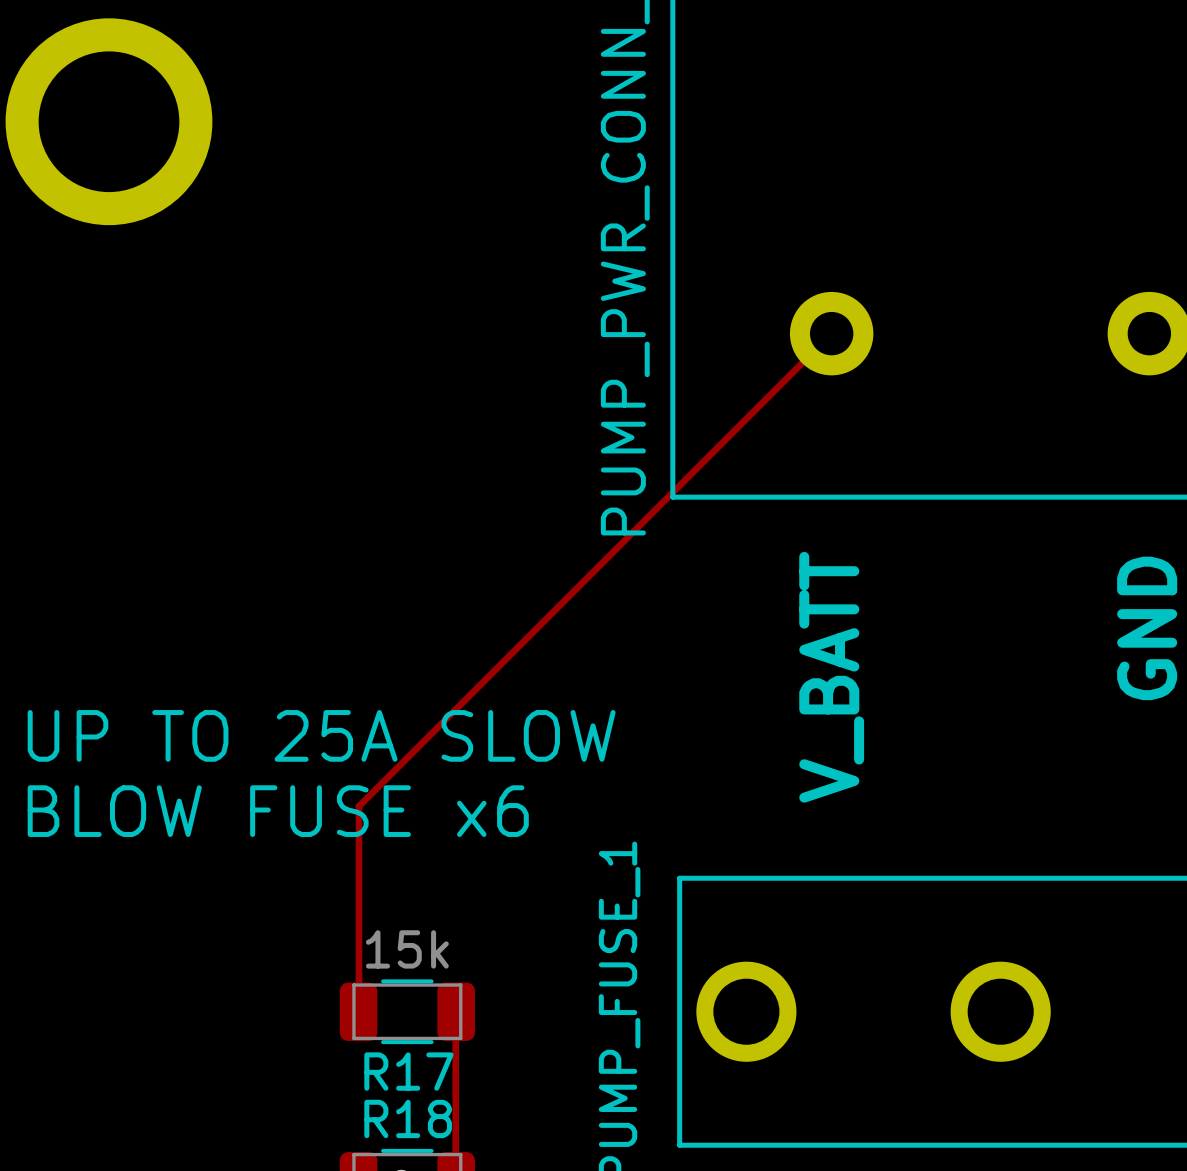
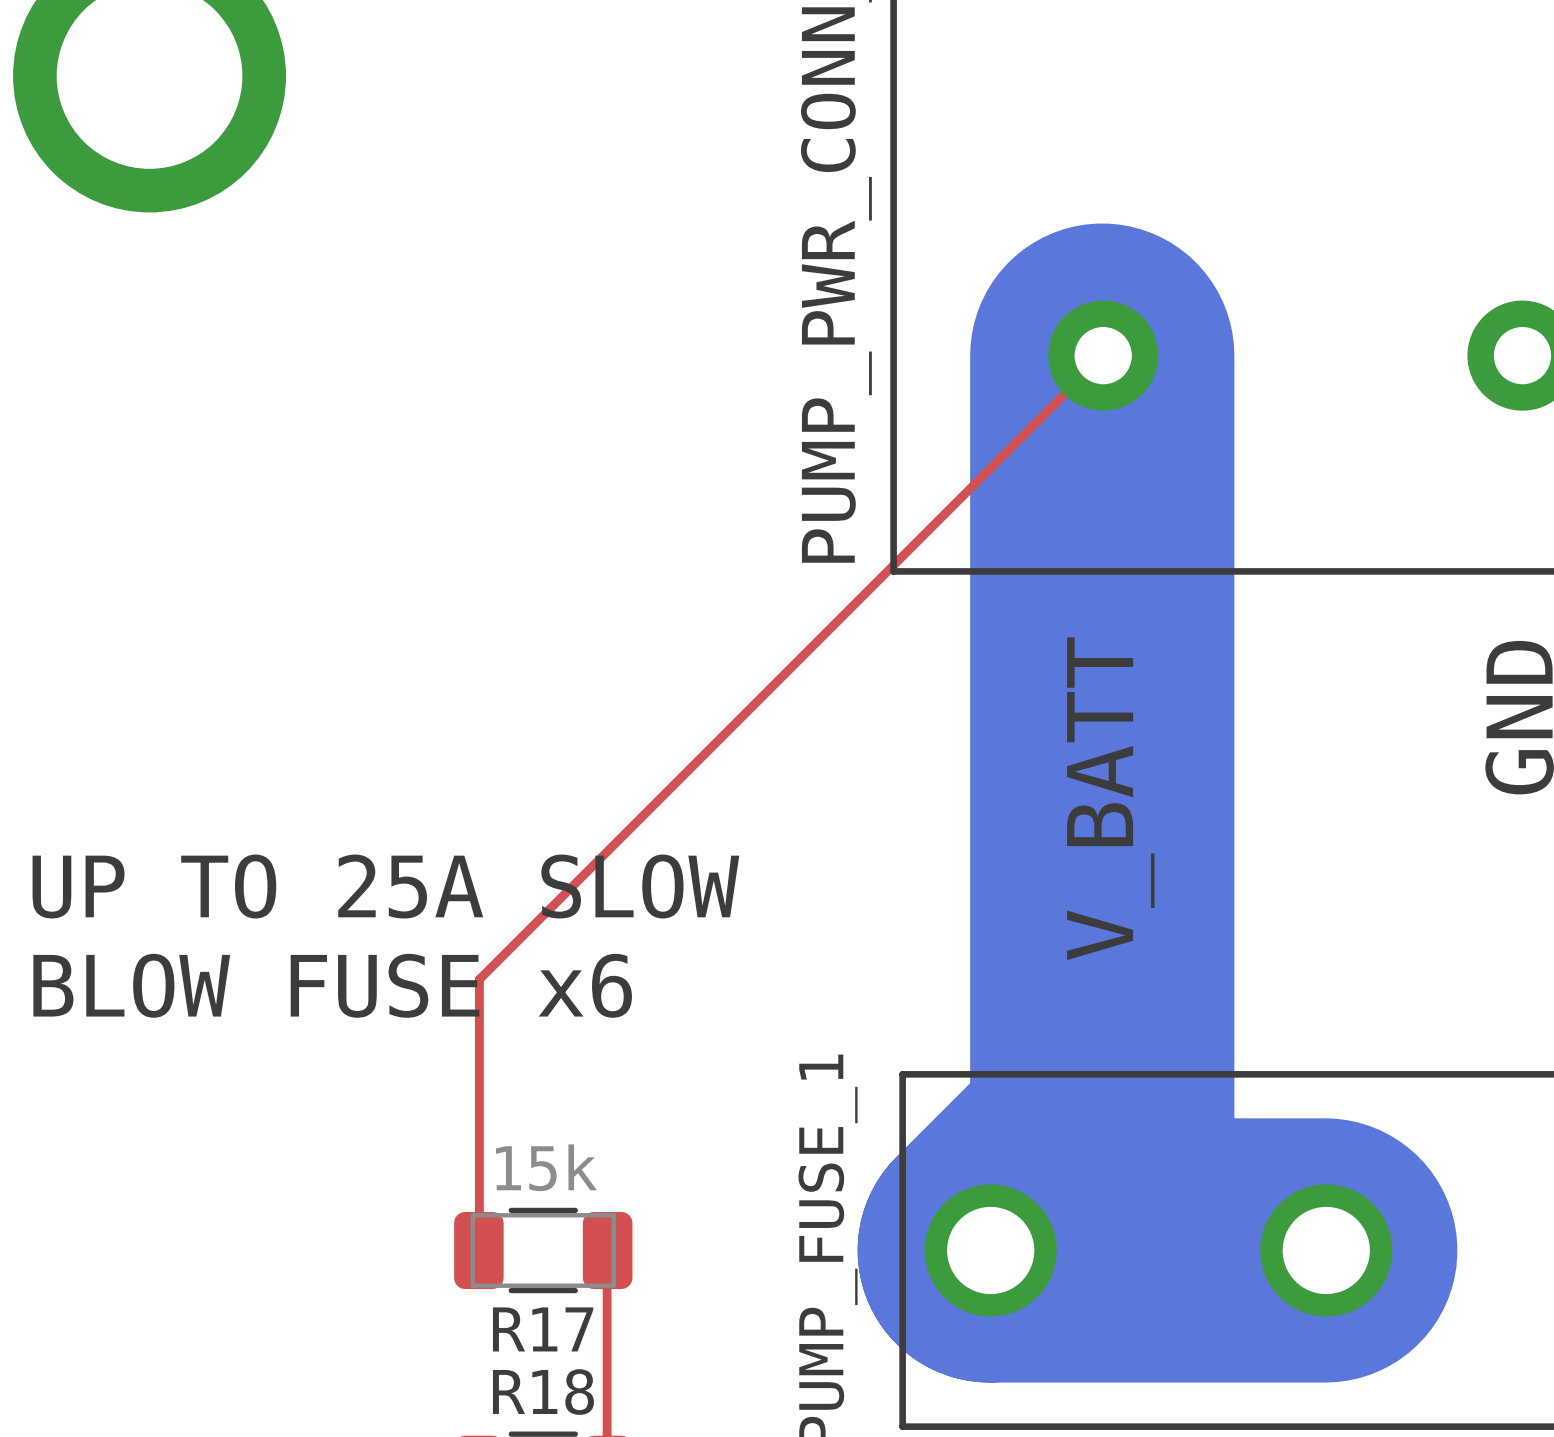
bottom track: none -> (1102, 355) (1102, 1137) (989, 1250) (1325, 1250)

